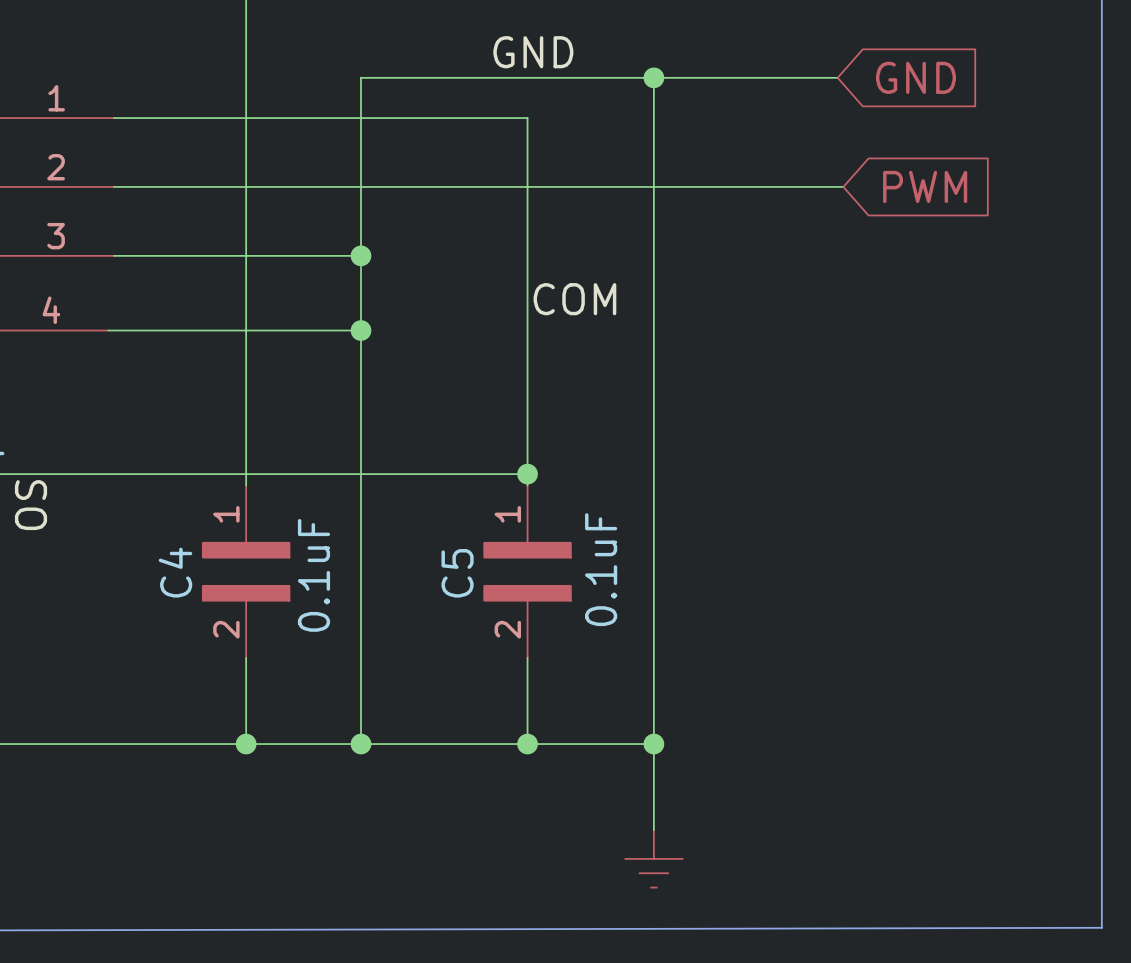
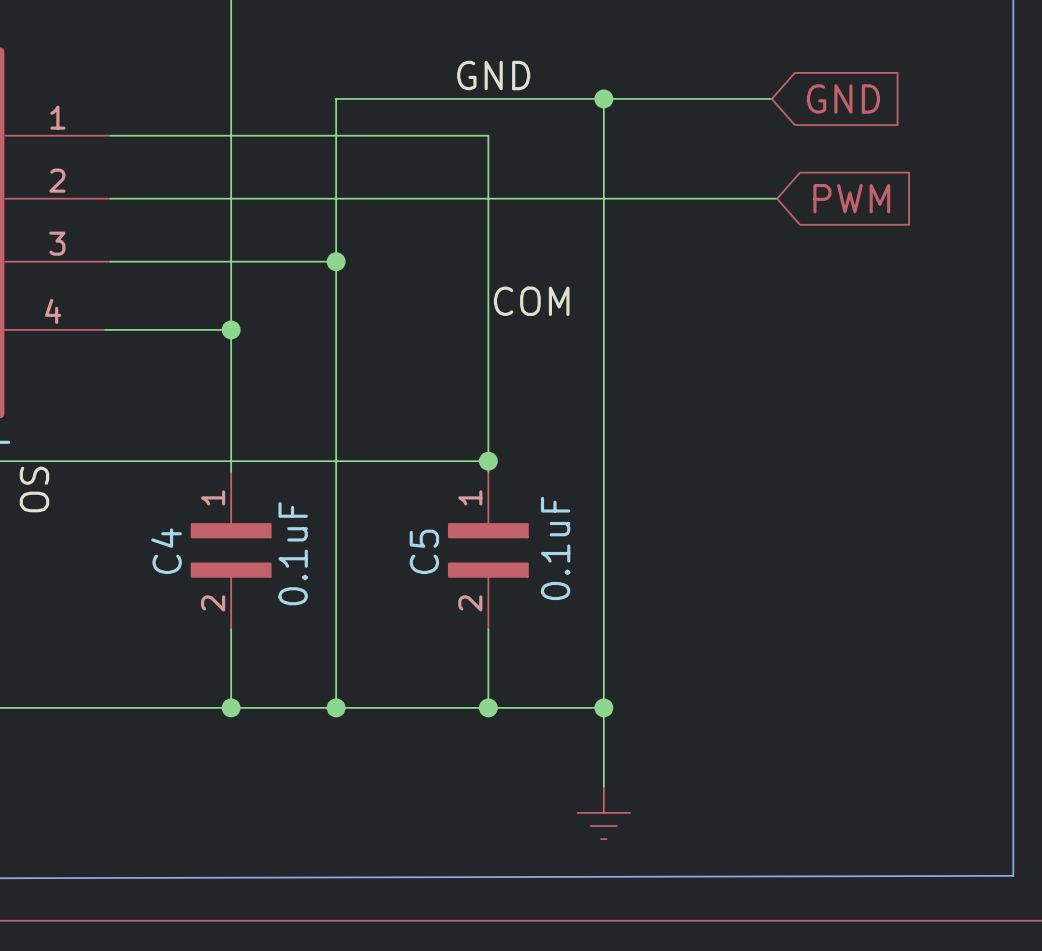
wire: (246, 330) (361, 330) -> none
junction position: (361, 330) -> (231, 329)

